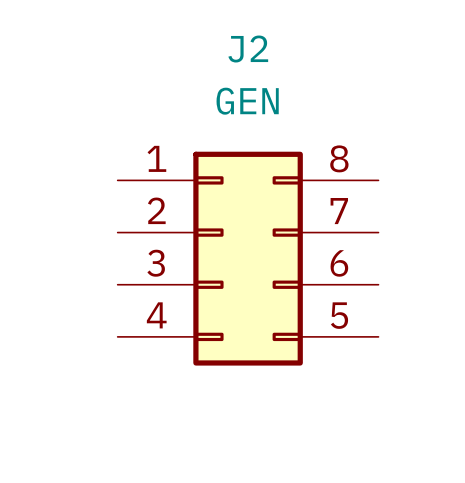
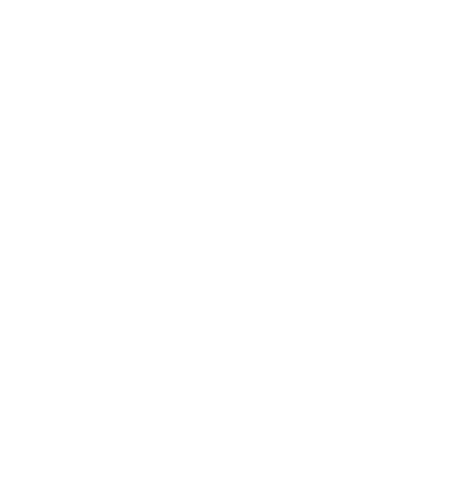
J2: GEN (248, 258) -> none

